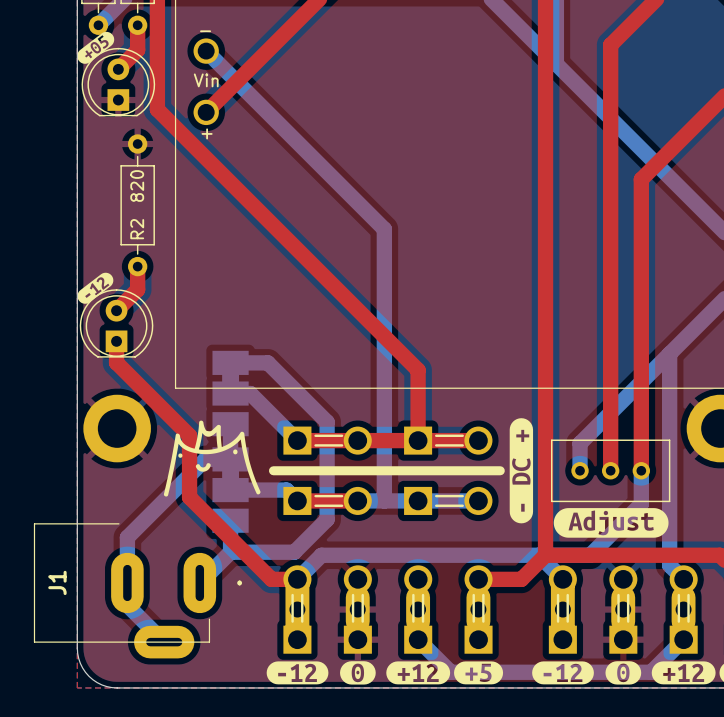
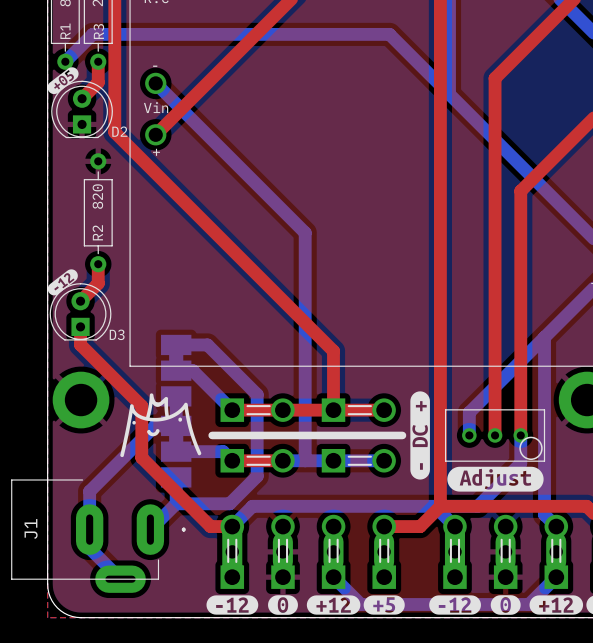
D2 name: none -> D2 (119, 131)
D3 name: none -> D3 (117, 334)
drawing: none -> [519, 436, 543, 461]

